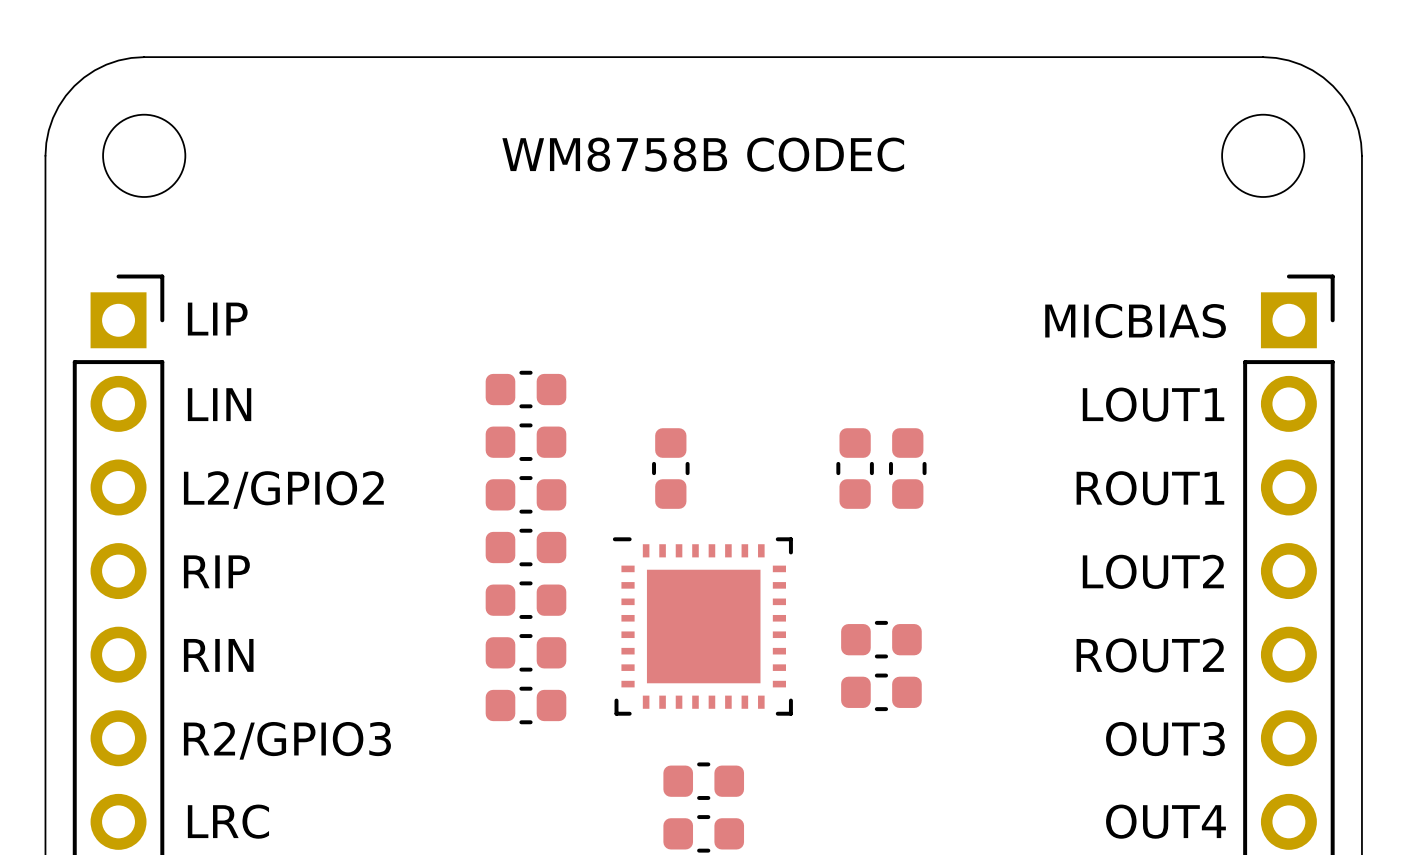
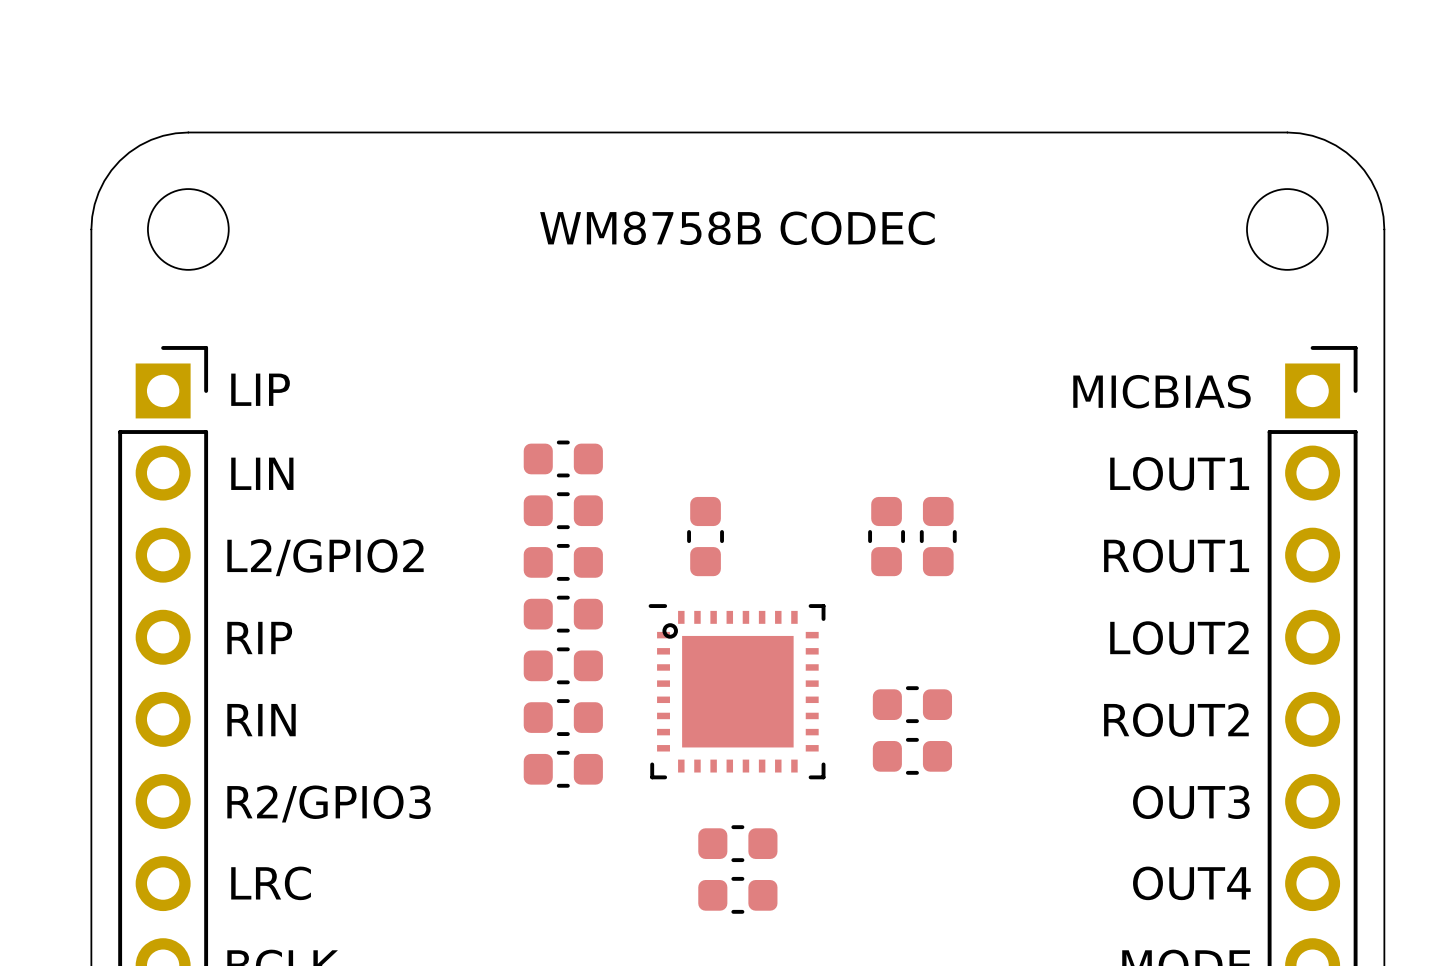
drawing: none -> [662, 623, 678, 639]

